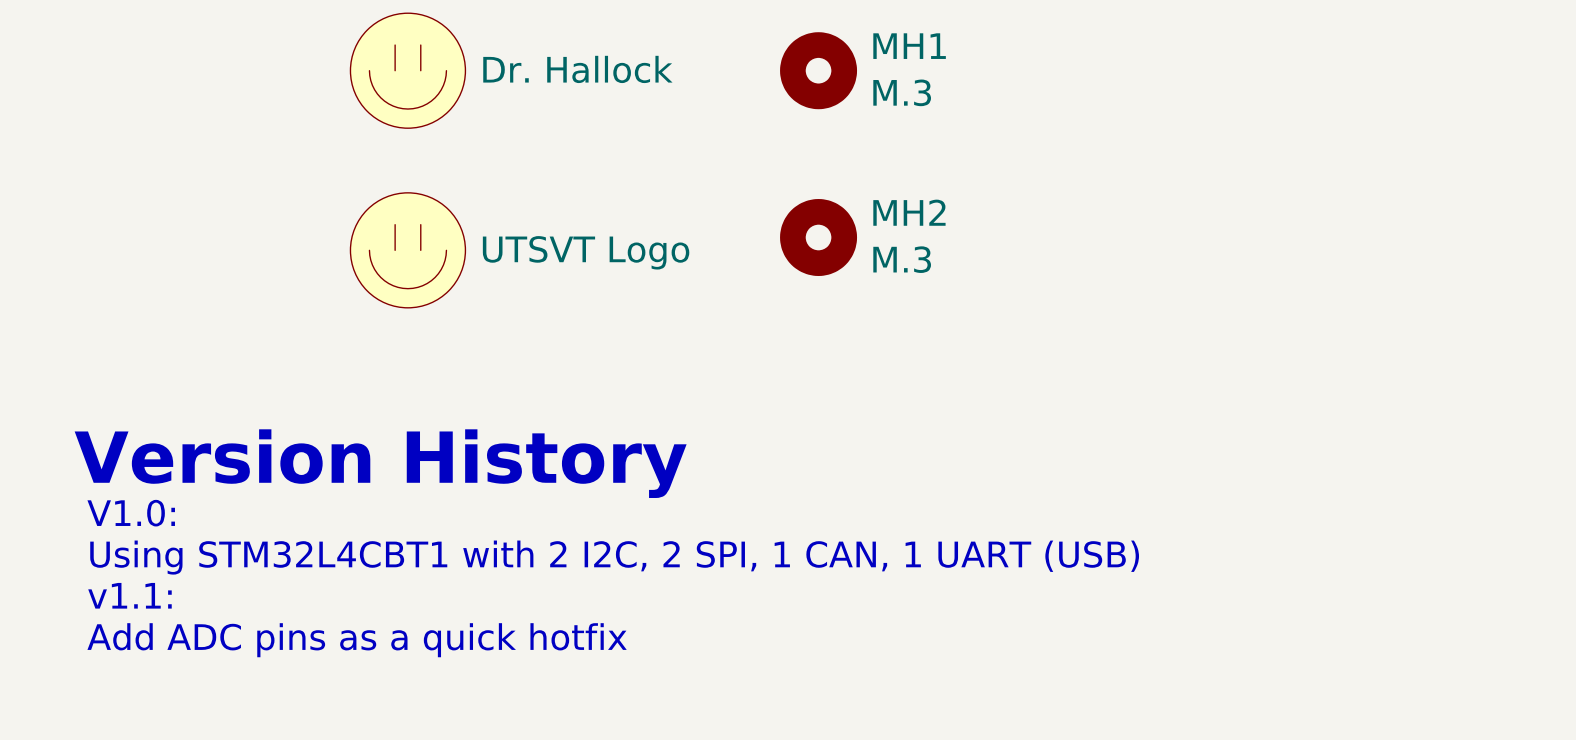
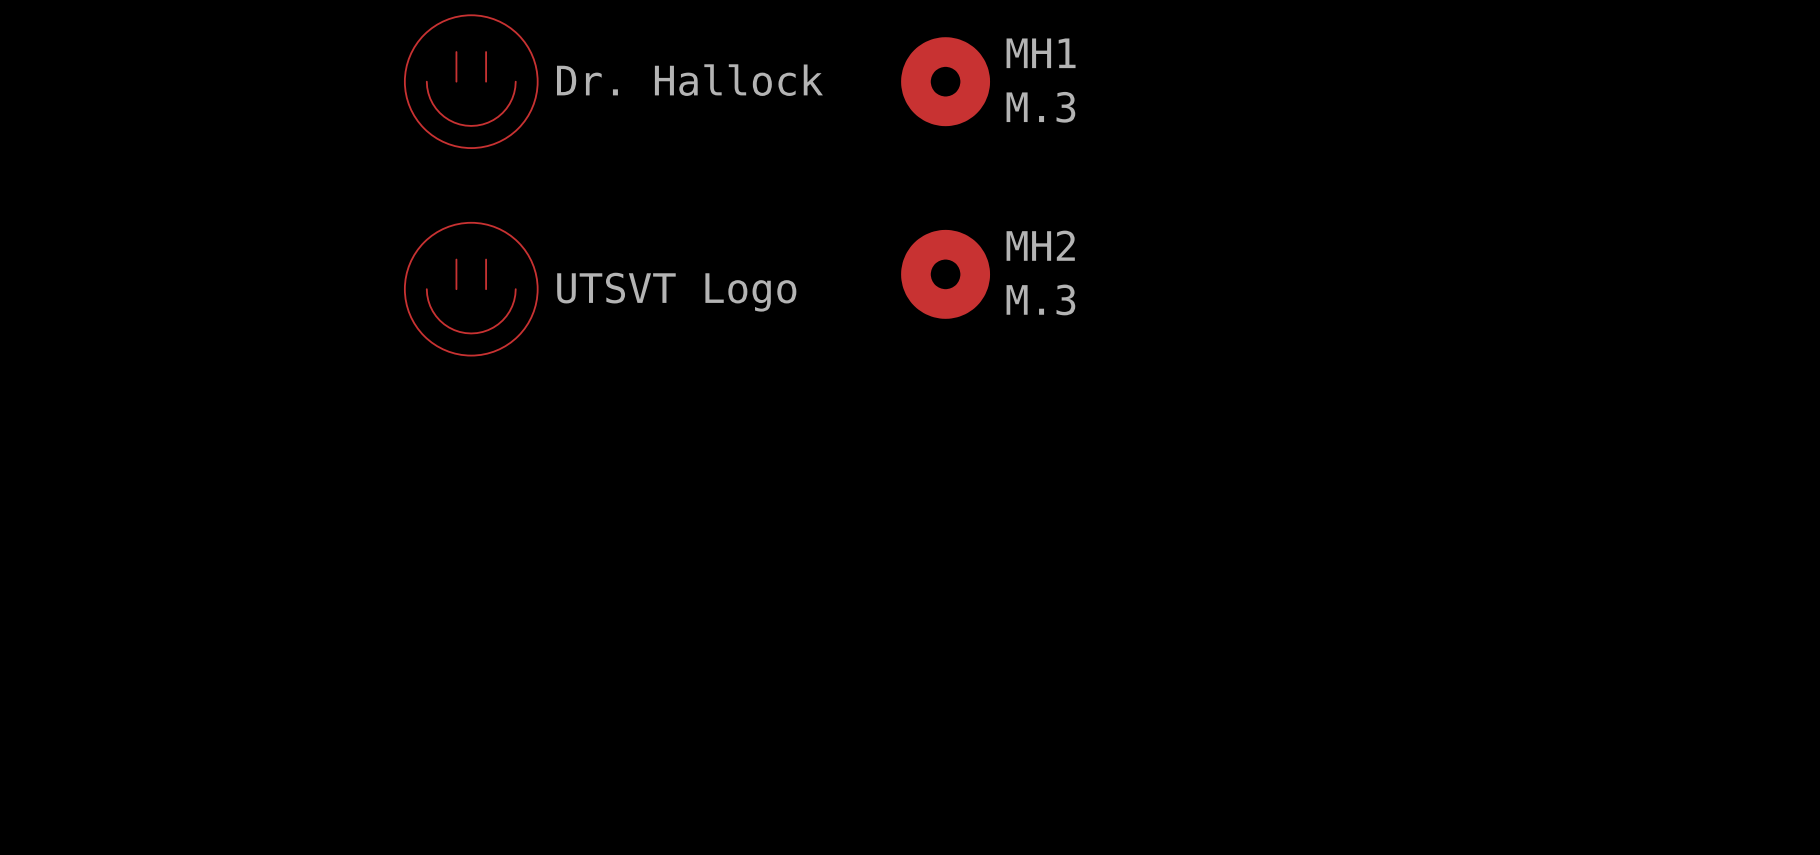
text: Version History (380, 463) -> none
text: V1.0: (131, 513) -> none
text: Using STM32L4CBT1 with 2 I2C, 2 SPI, 1 CAN, 1 UART (USB) (614, 557) -> none
text: v1.1: (129, 595) -> none
text: Add ADC pins as a quick hotfix (357, 640) -> none

